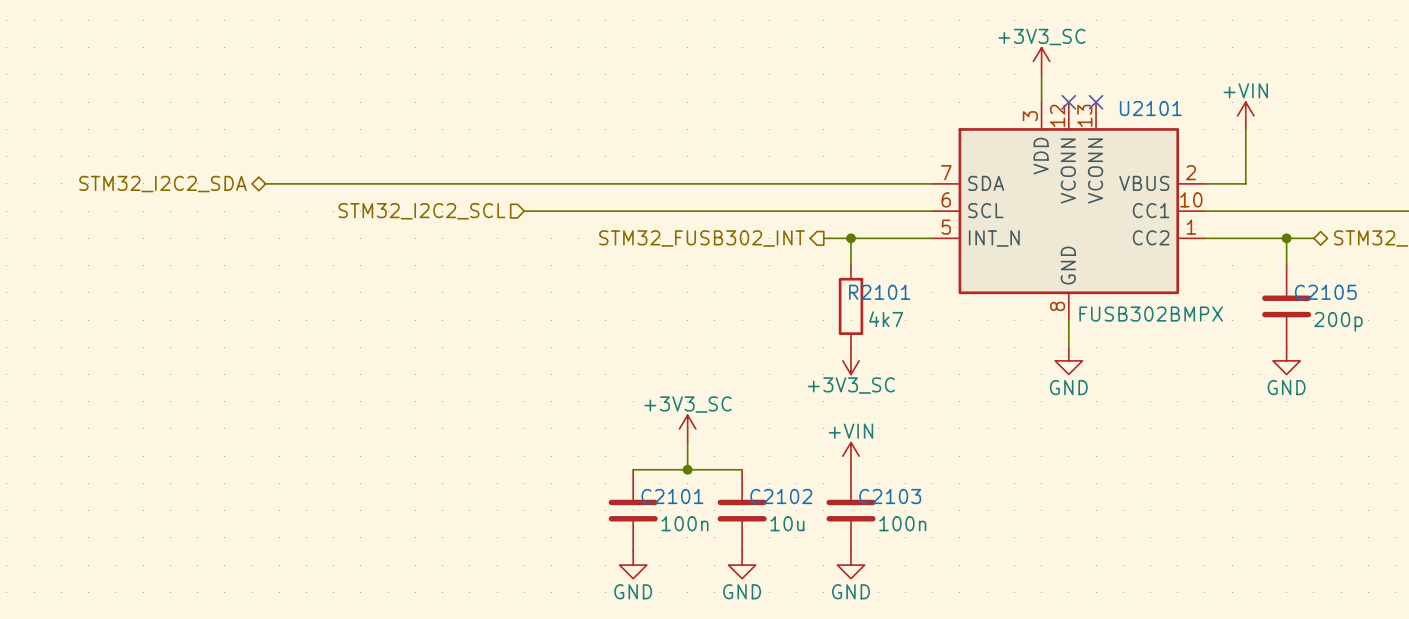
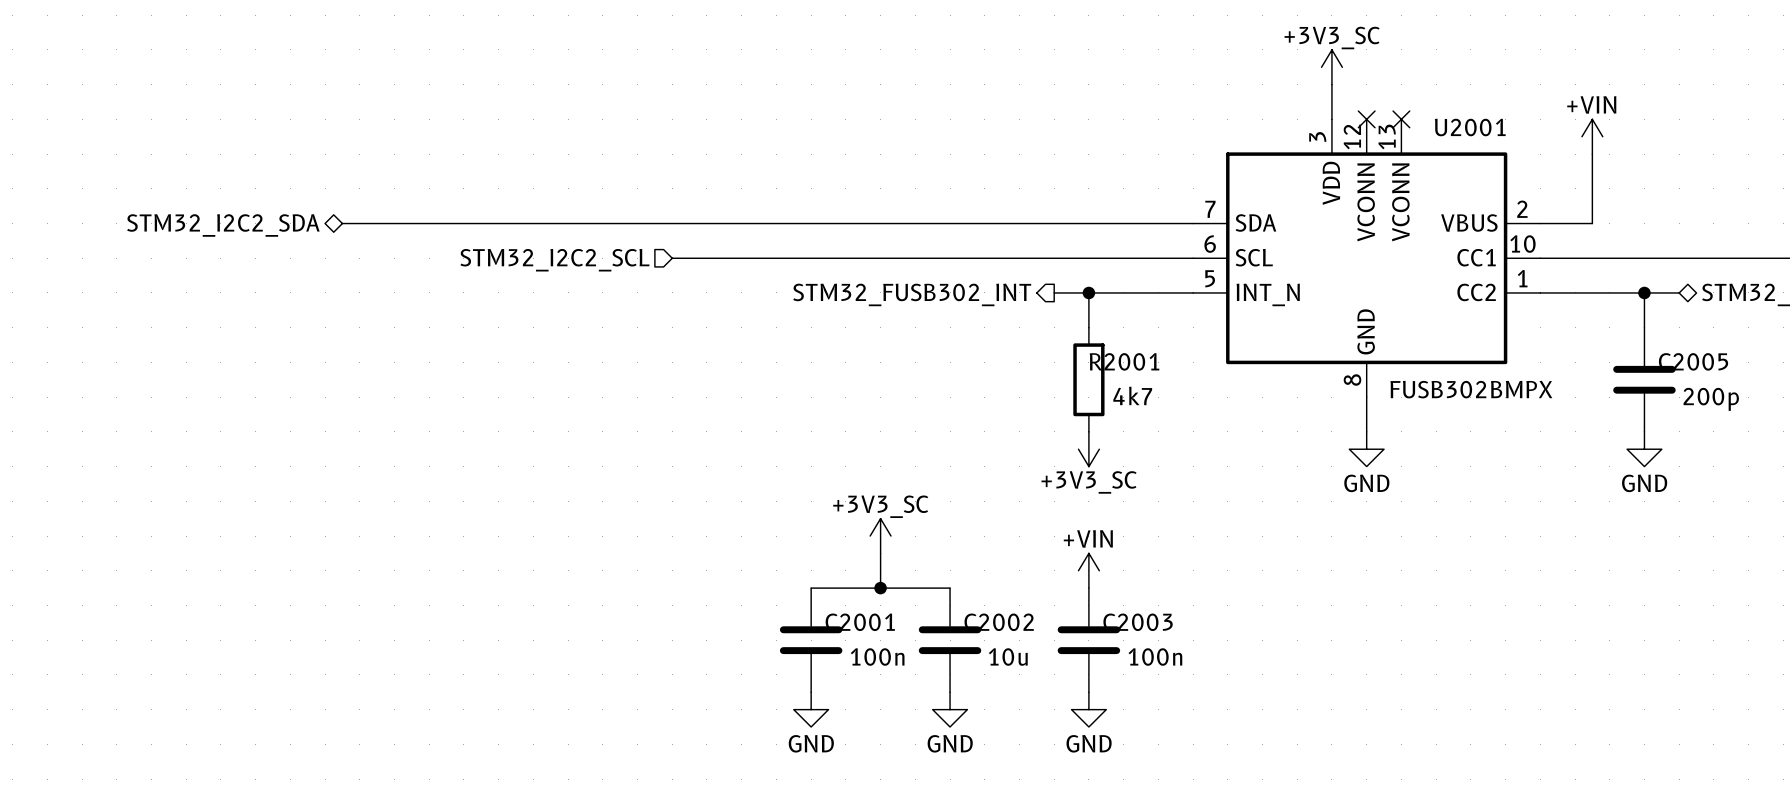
U2101 name: U2101 (1150, 108) -> U2001 (1470, 127)
R2101 name: R2101 (879, 292) -> R2001 (1124, 361)
C2105 name: C2105 (1325, 292) -> C2005 (1693, 361)
C2101 name: C2101 (672, 496) -> C2001 (860, 622)
C2102 name: C2102 (781, 496) -> C2002 (999, 622)
C2103 name: C2103 (890, 496) -> C2003 (1138, 622)

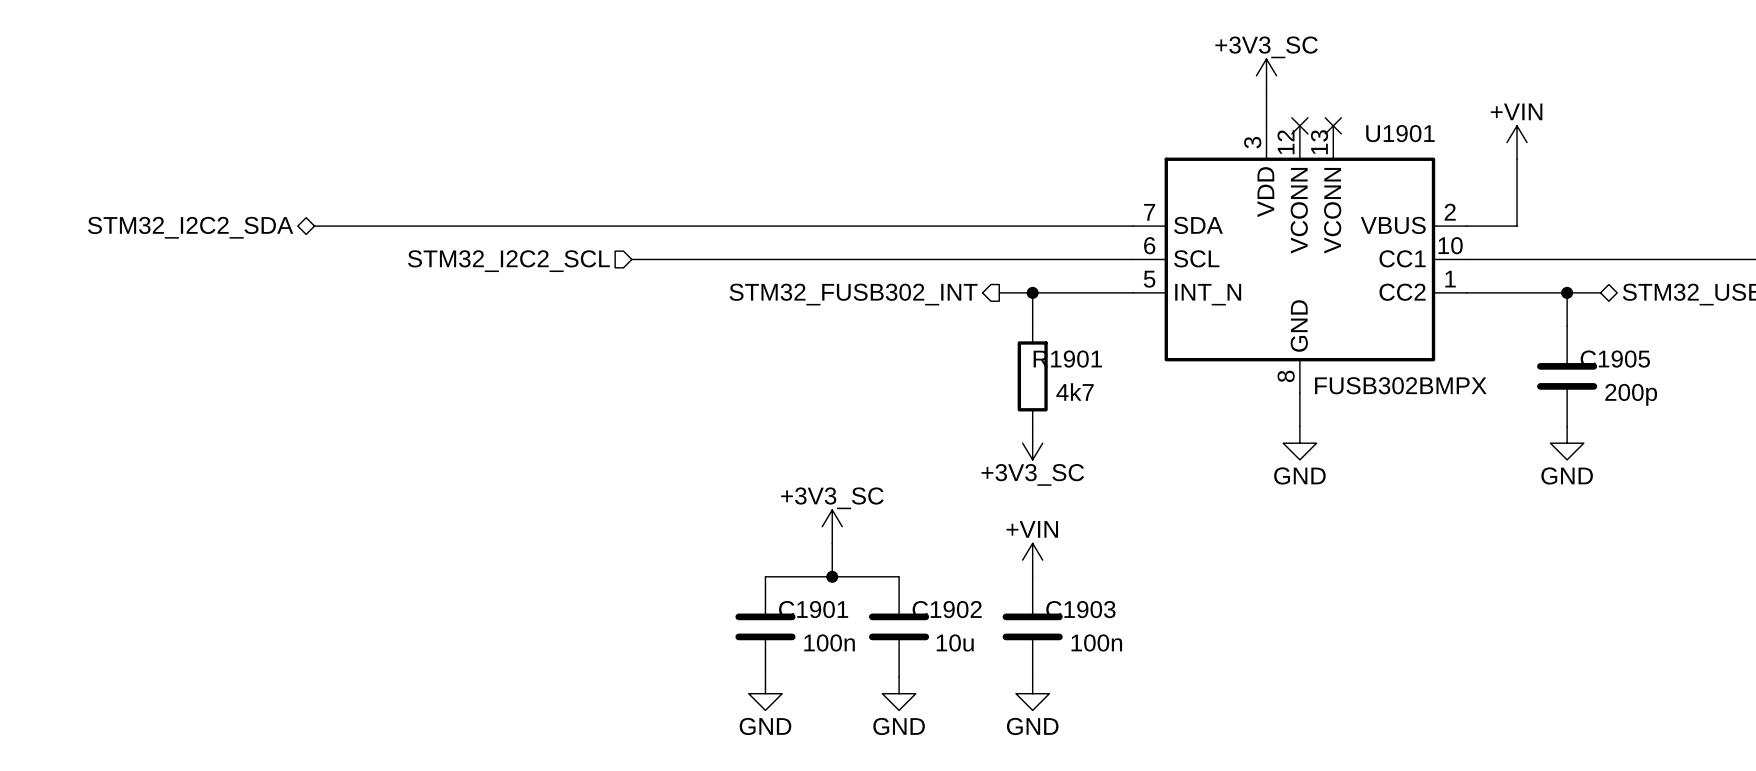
U2001 name: U2001 (1470, 127) -> U1901 (1400, 133)
R2001 name: R2001 (1124, 361) -> R1901 (1067, 359)
C2005 name: C2005 (1693, 361) -> C1905 (1615, 359)
C2001 name: C2001 (860, 622) -> C1901 (813, 609)
C2002 name: C2002 (999, 622) -> C1902 (947, 609)
C2003 name: C2003 (1138, 622) -> C1903 (1080, 609)

